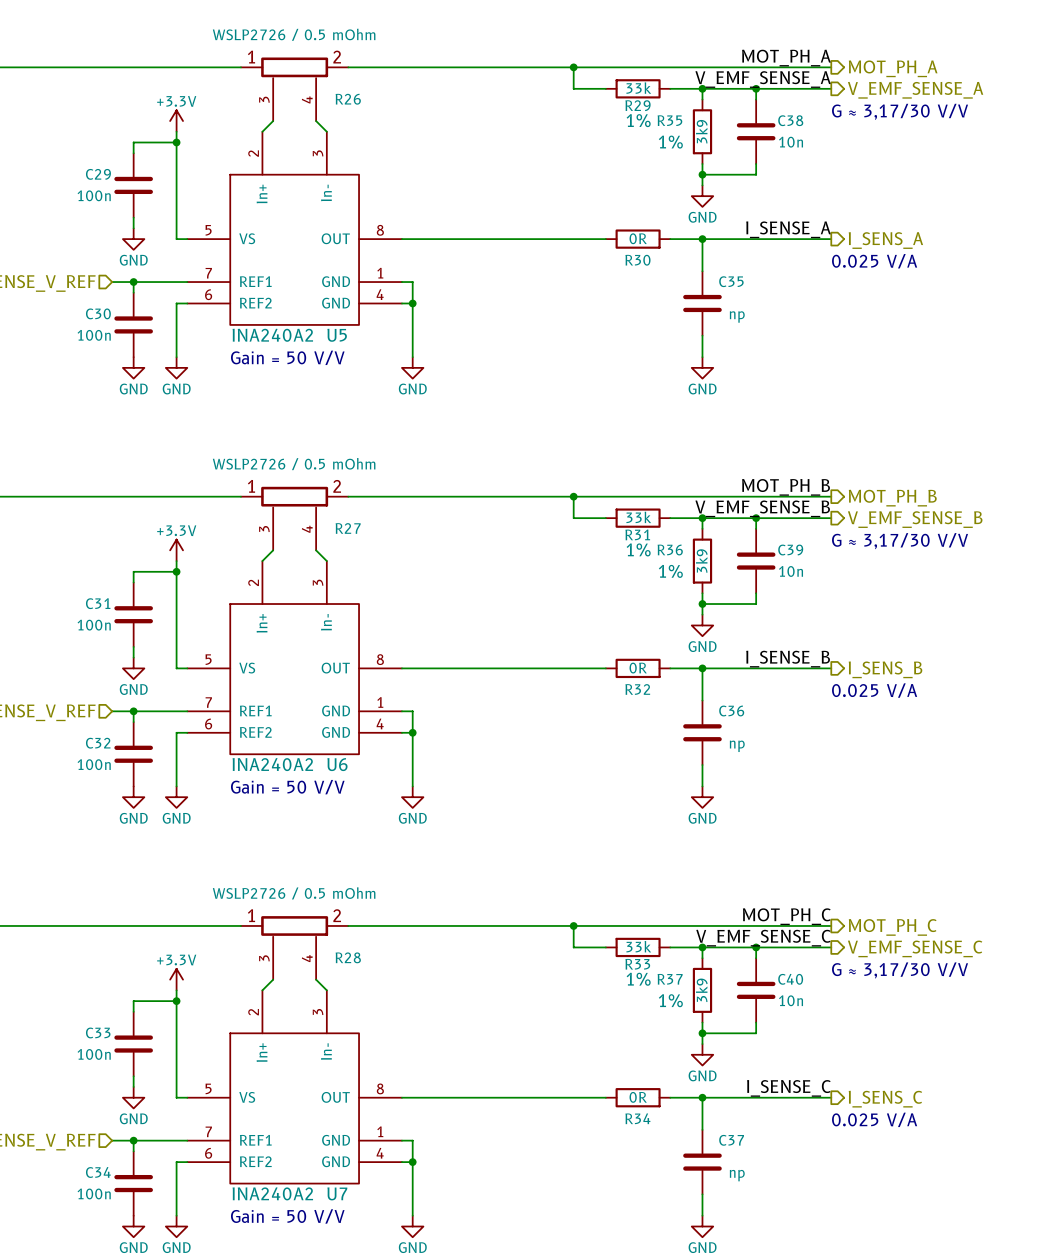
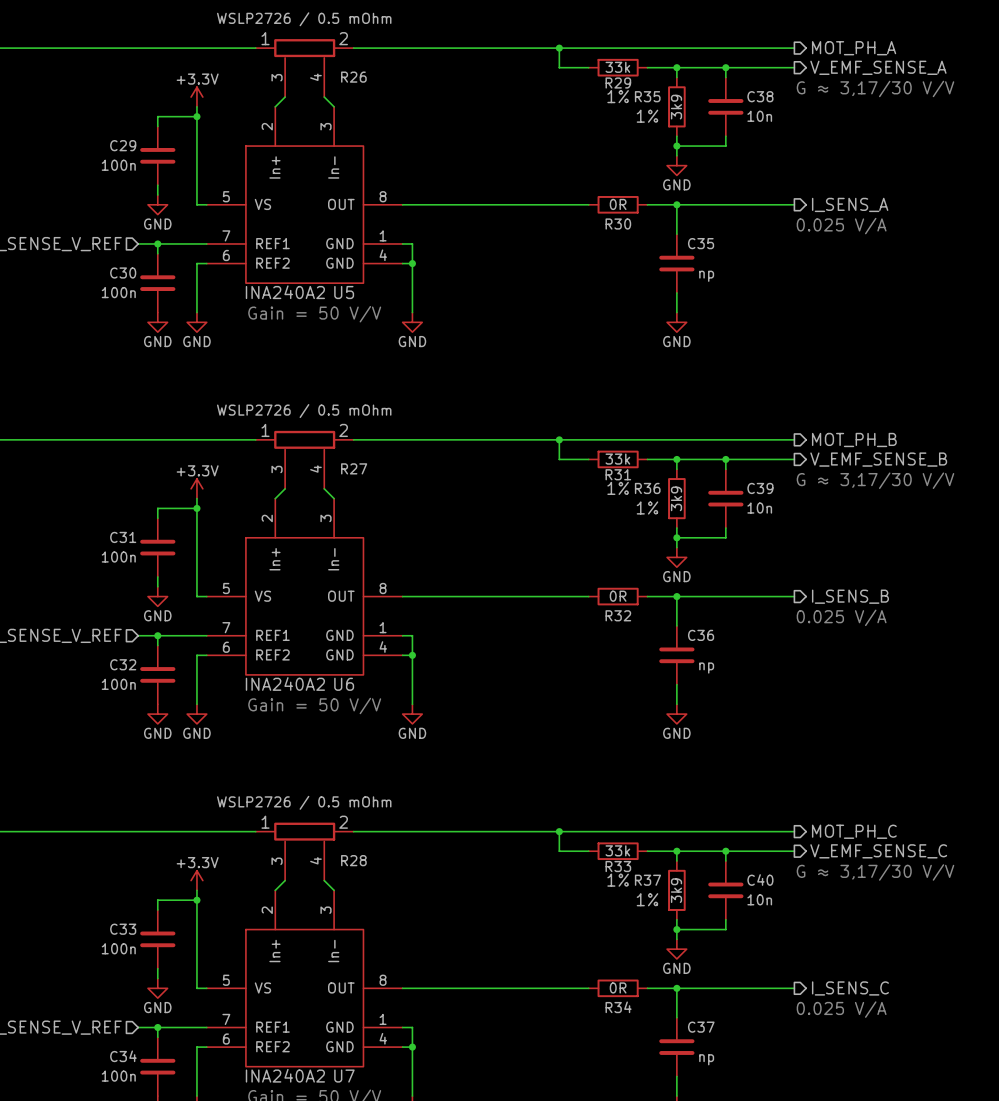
label: MOT_PH_A (786, 58) -> none
label: V_EMF_SENSE_A (763, 79) -> none
label: I_SENSE_A (788, 229) -> none
label: MOT_PH_B (786, 487) -> none
label: V_EMF_SENSE_B (762, 508) -> none
label: I_SENSE_B (788, 659) -> none
label: MOT_PH_C (786, 916) -> none
label: V_EMF_SENSE_C (763, 938) -> none
label: I_SENSE_C (788, 1088) -> none

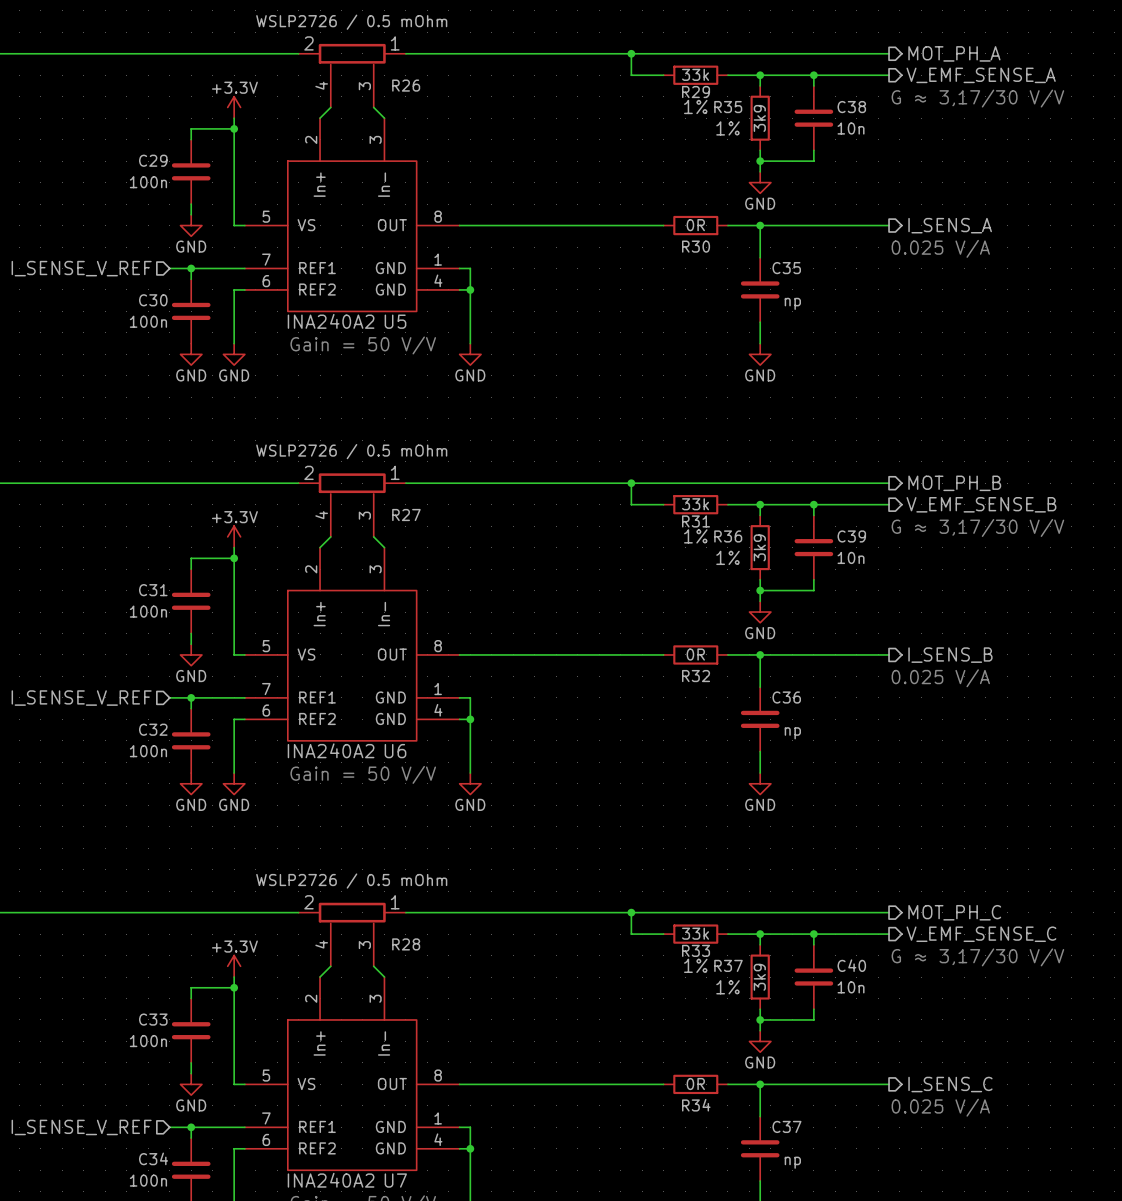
R26 flip: as is (304, 48) -> left-right (352, 53)
R27 flip: as is (304, 439) -> left-right (352, 483)
R28 flip: as is (304, 831) -> left-right (352, 912)

